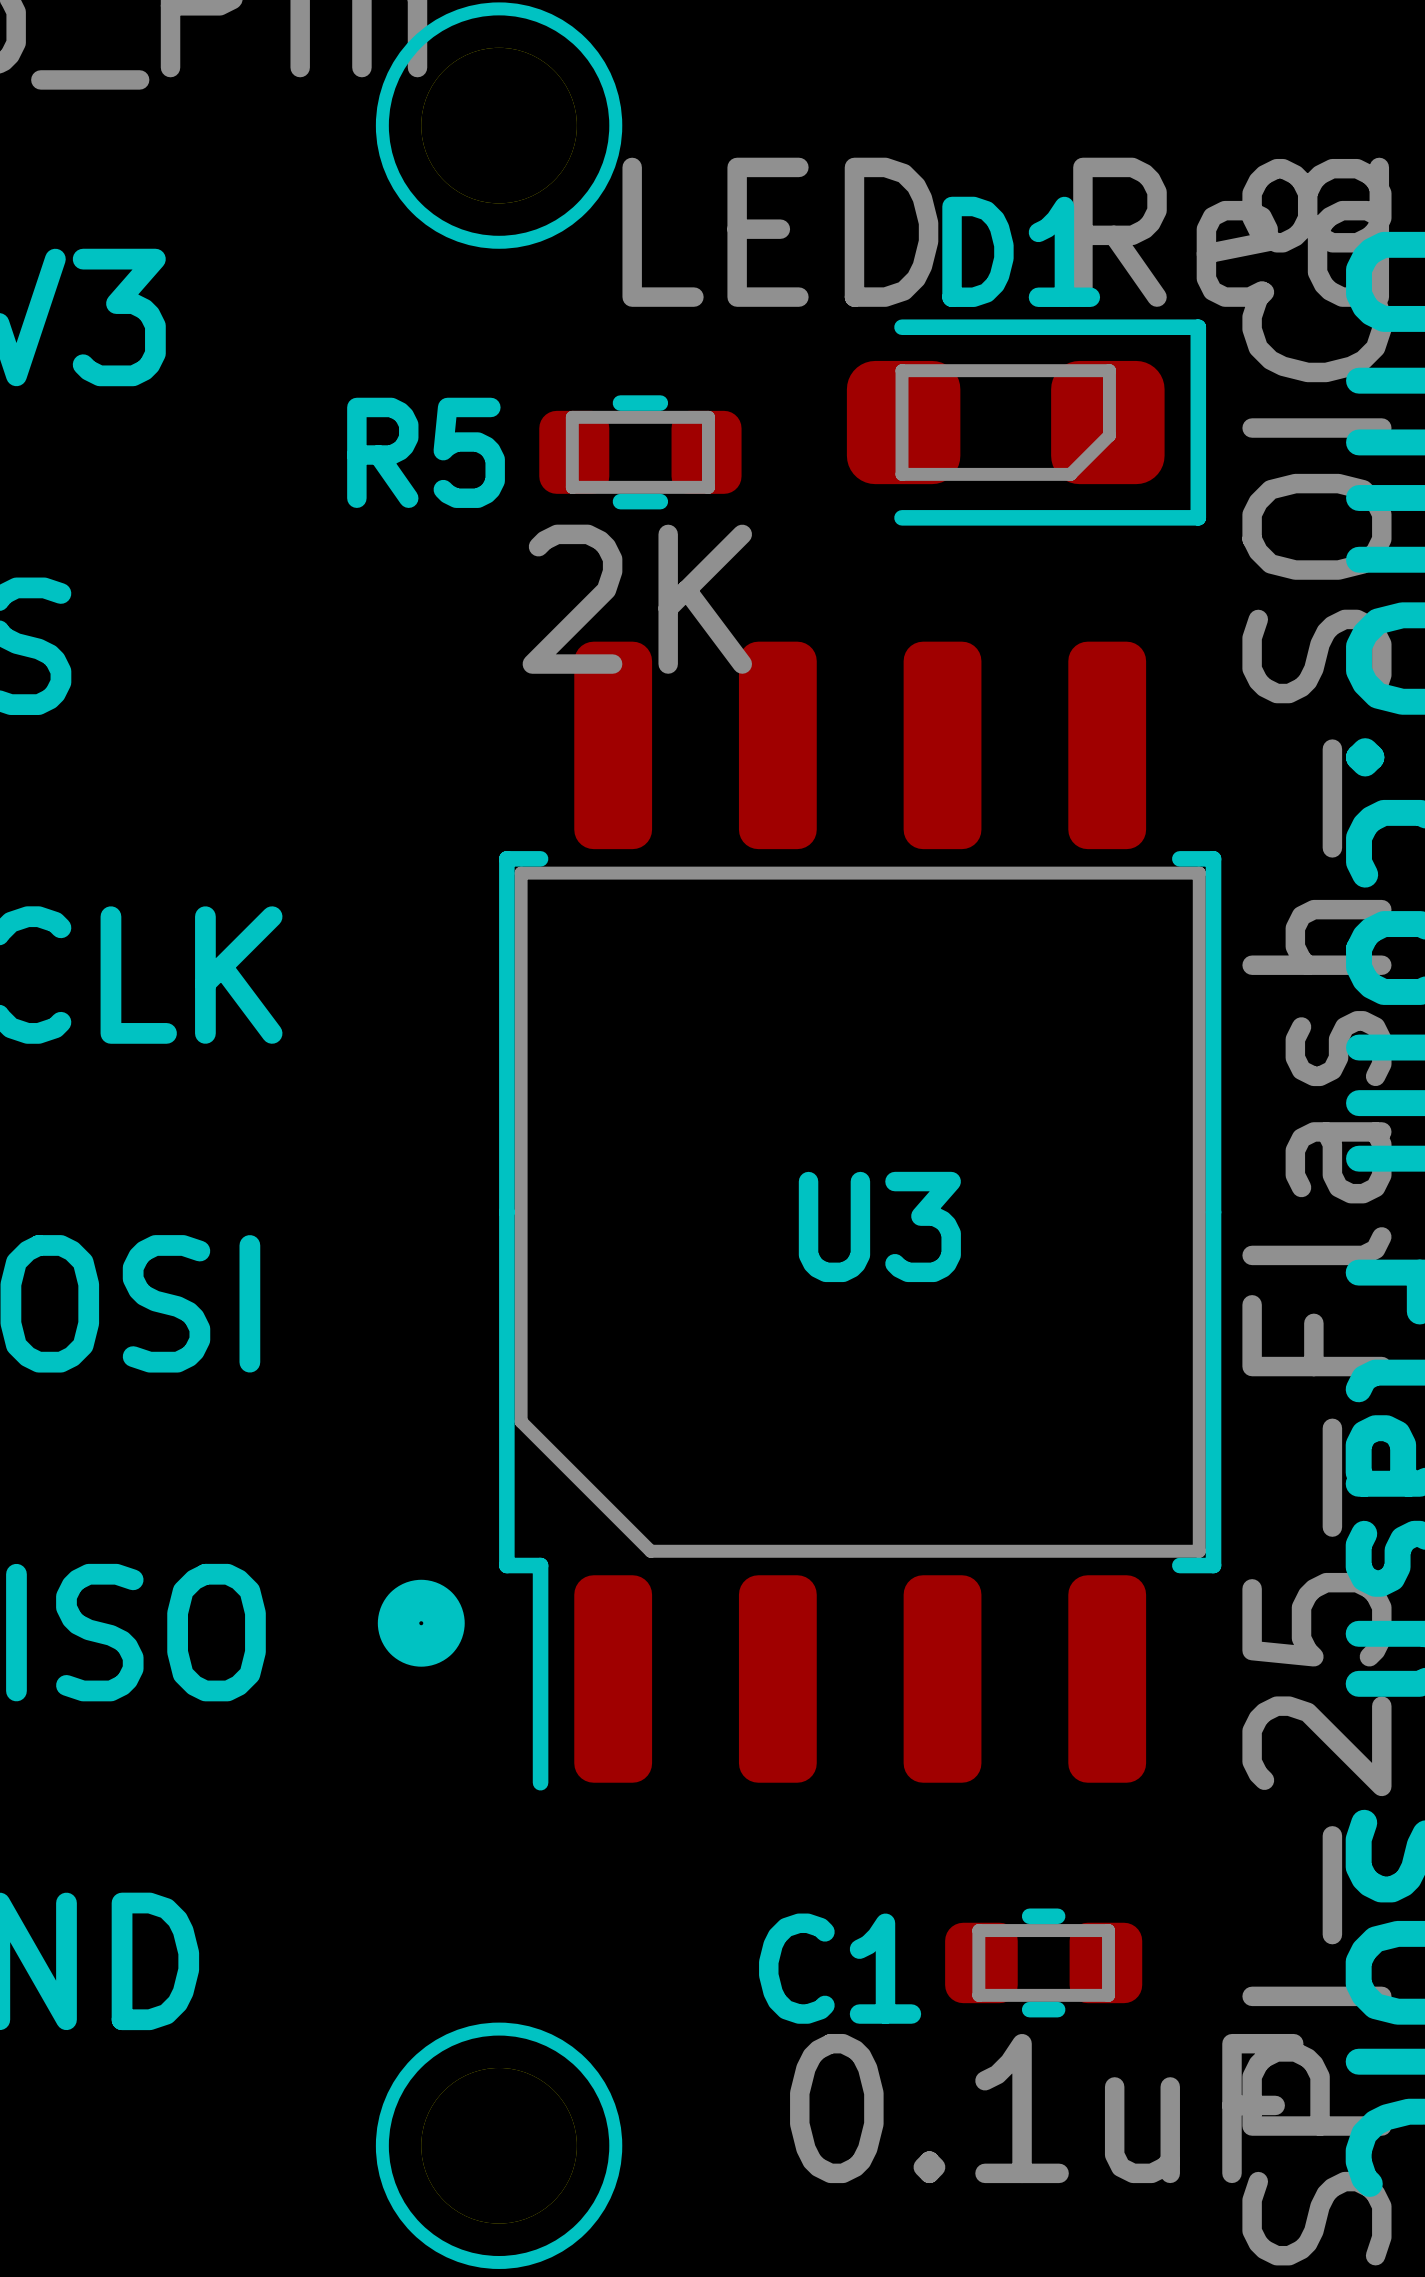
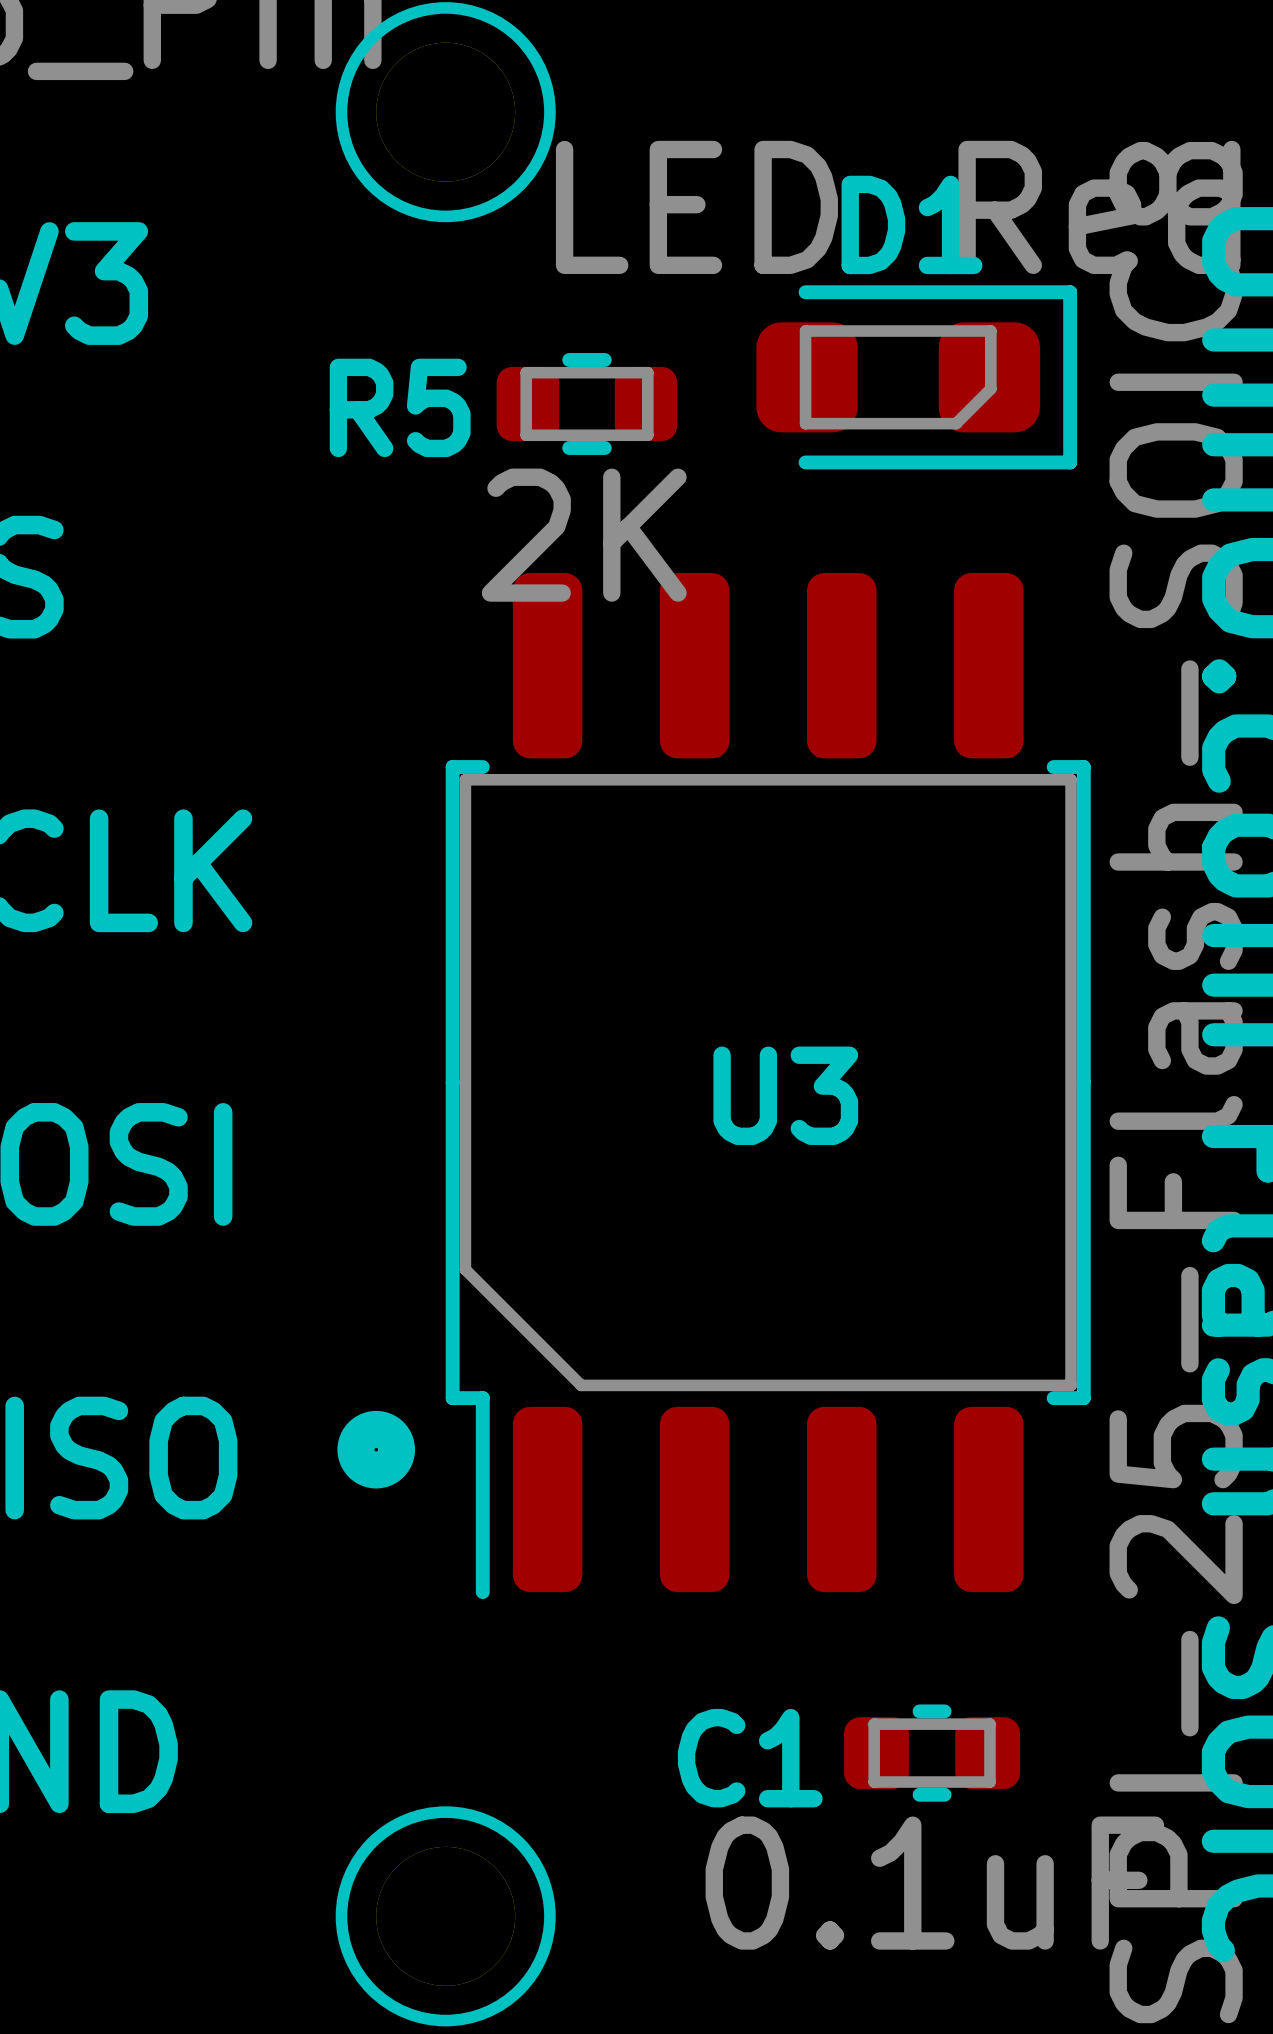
R5 name position: R5 (426, 452) -> R5 (400, 407)
R5 position: (640, 452) -> (586, 403)

